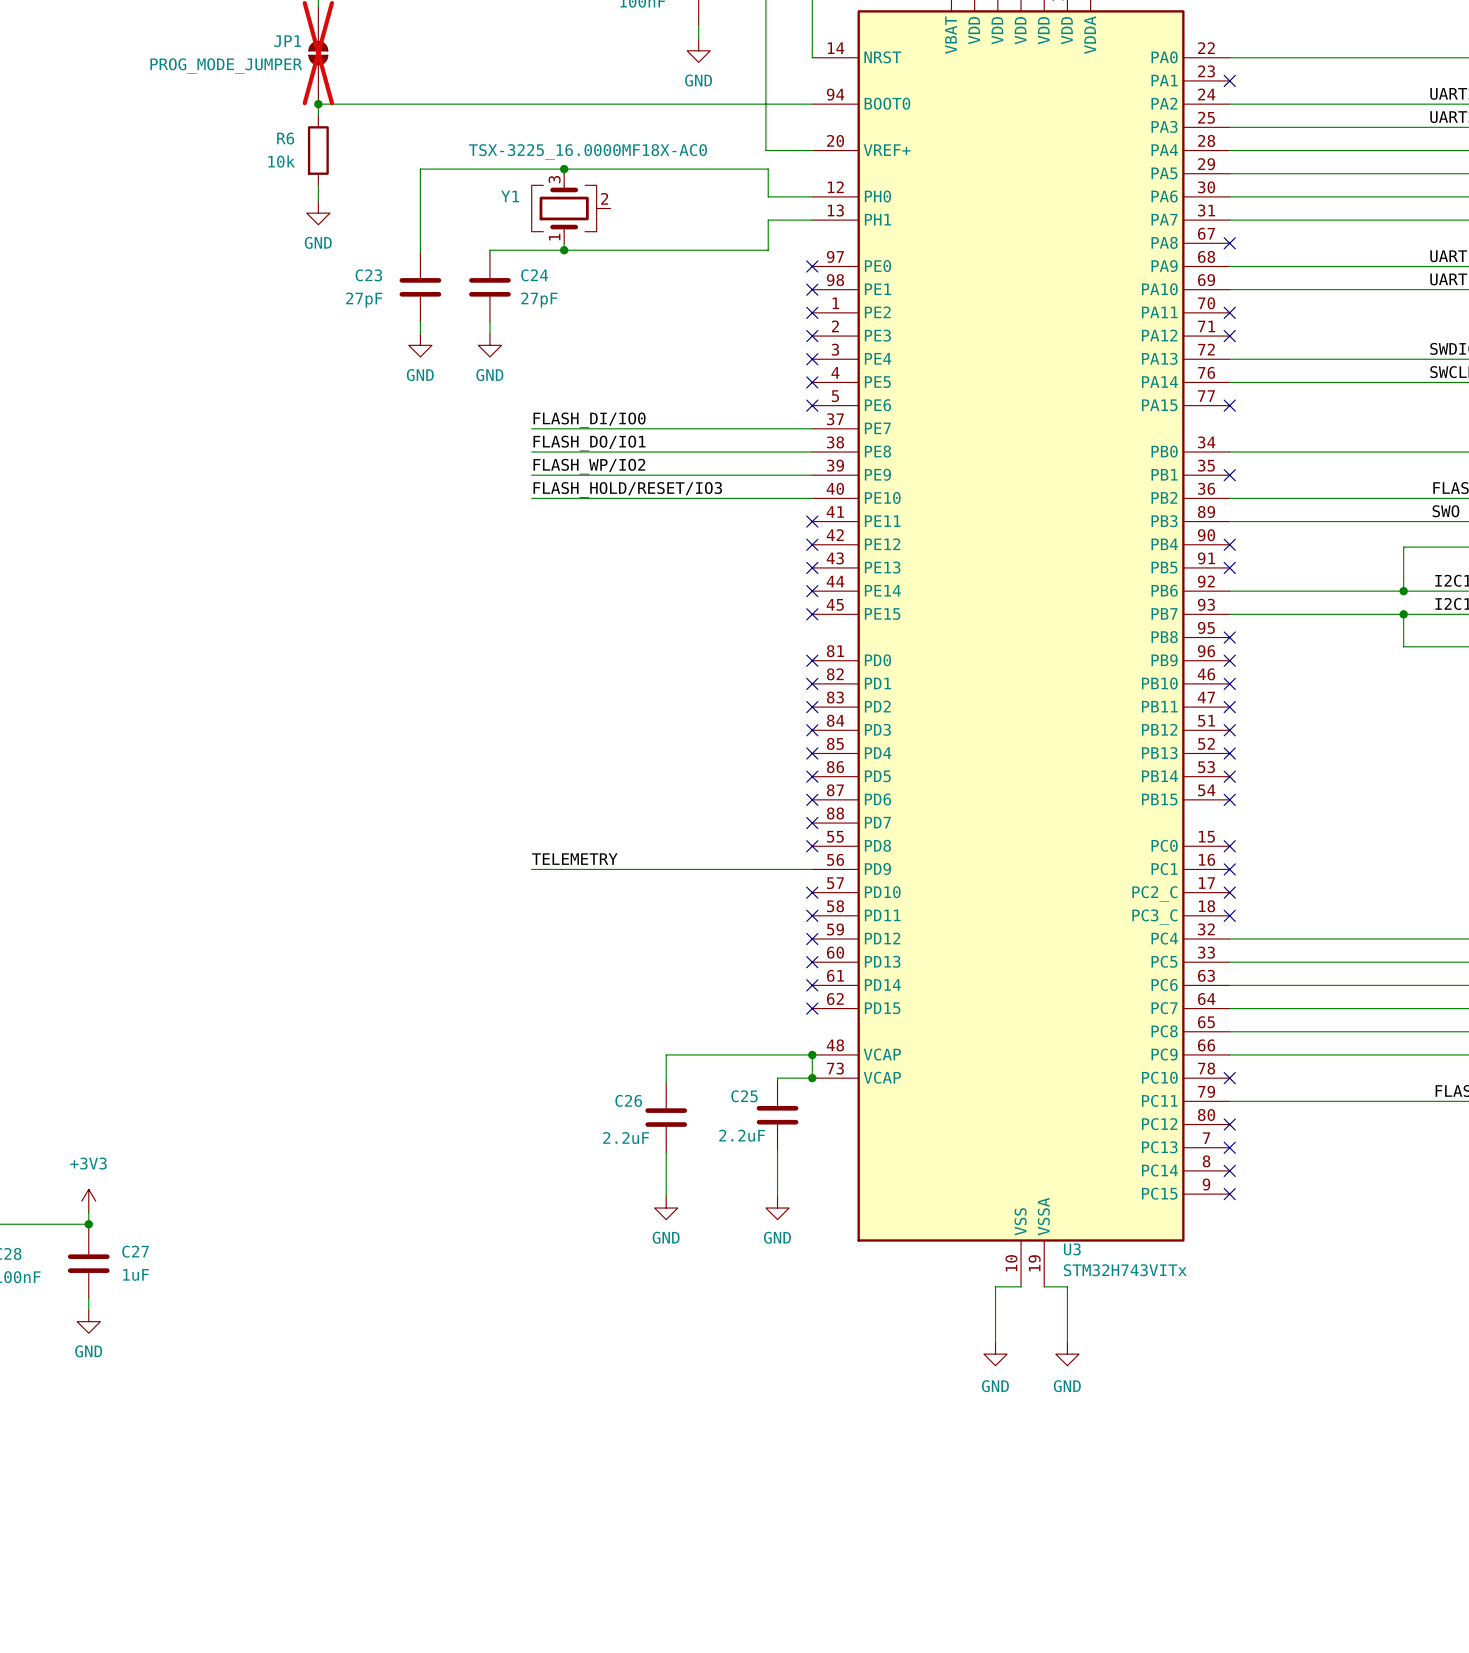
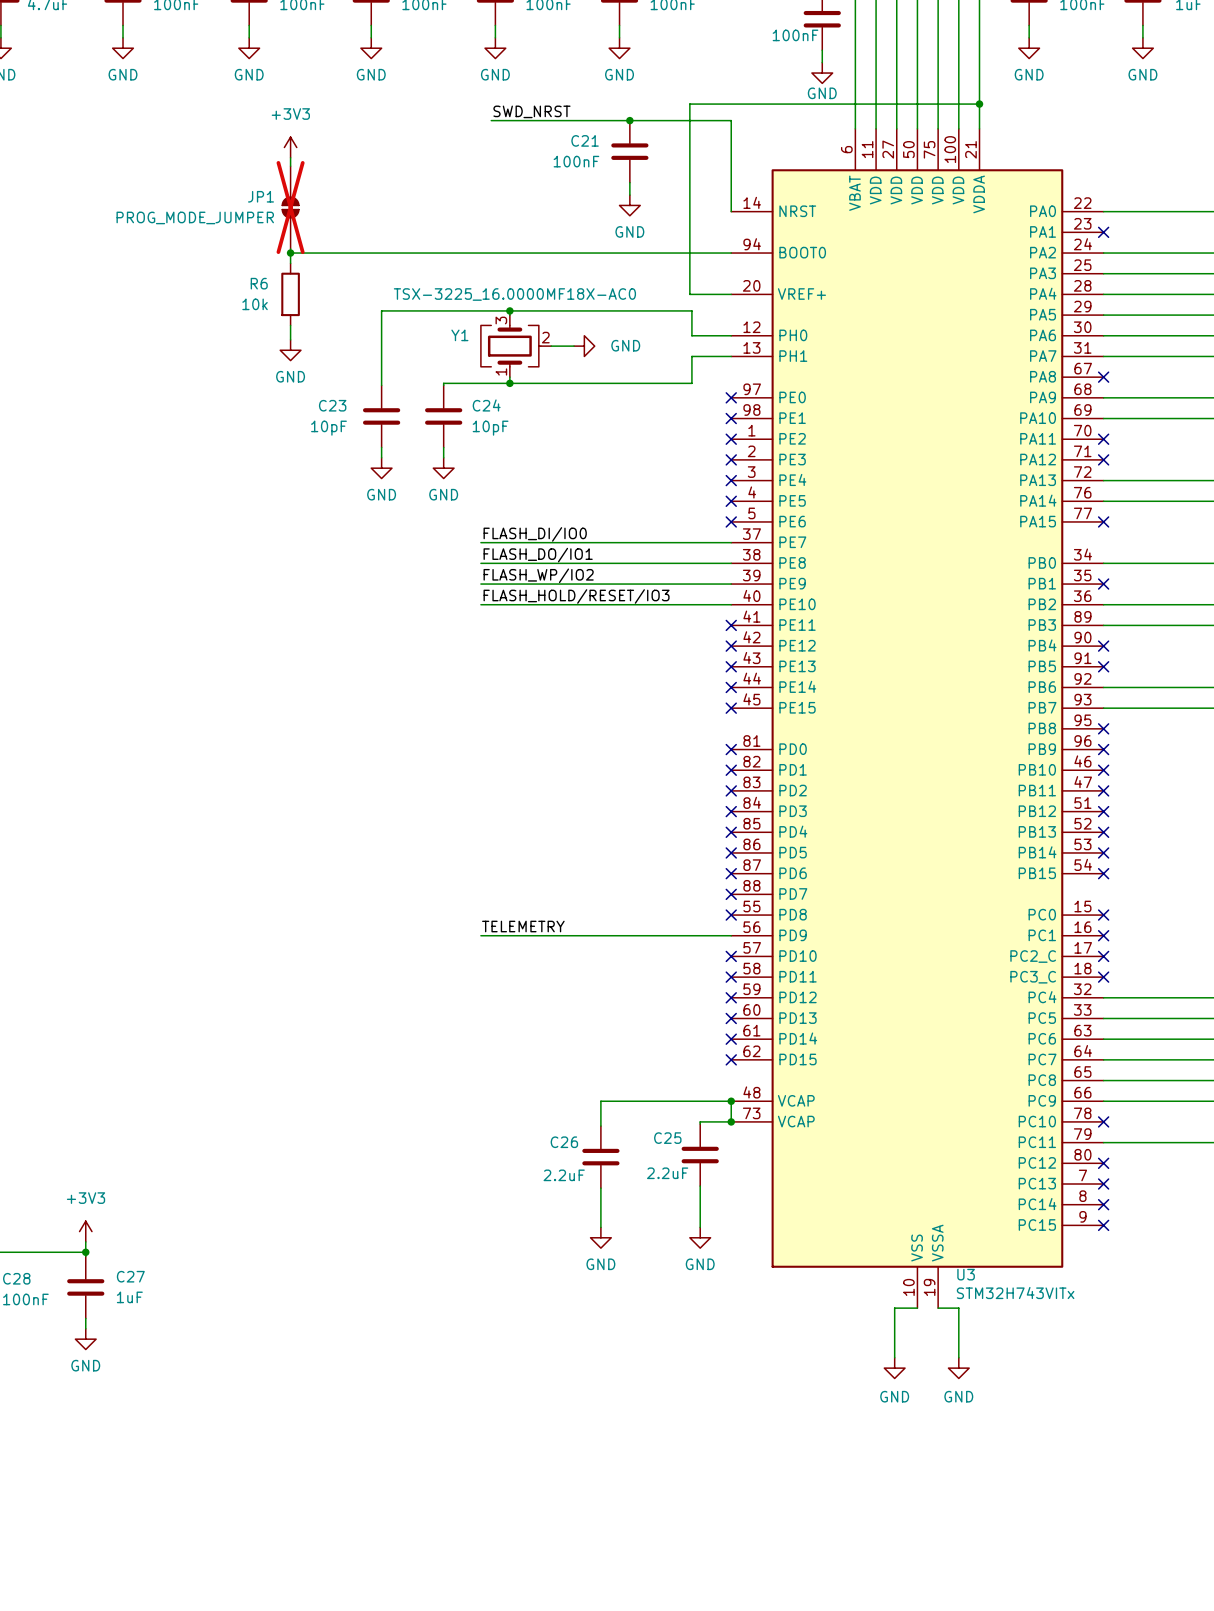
wire: none -> (551, 346) (574, 346)
power symbol: none -> GND (584, 346)
C23 value: 27pF (364, 300) -> 10pF (328, 428)
C24 value: 27pF (539, 300) -> 10pF (490, 428)

